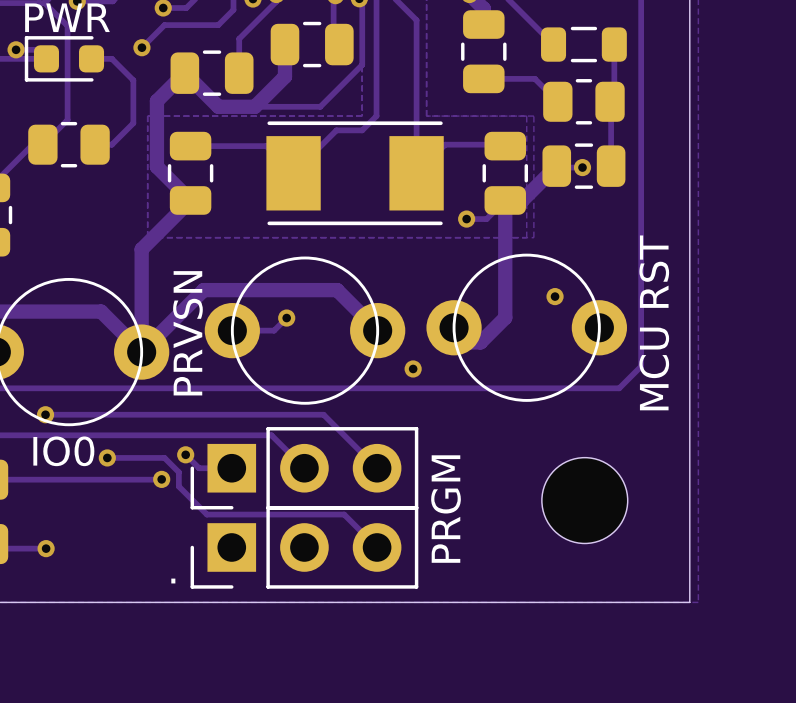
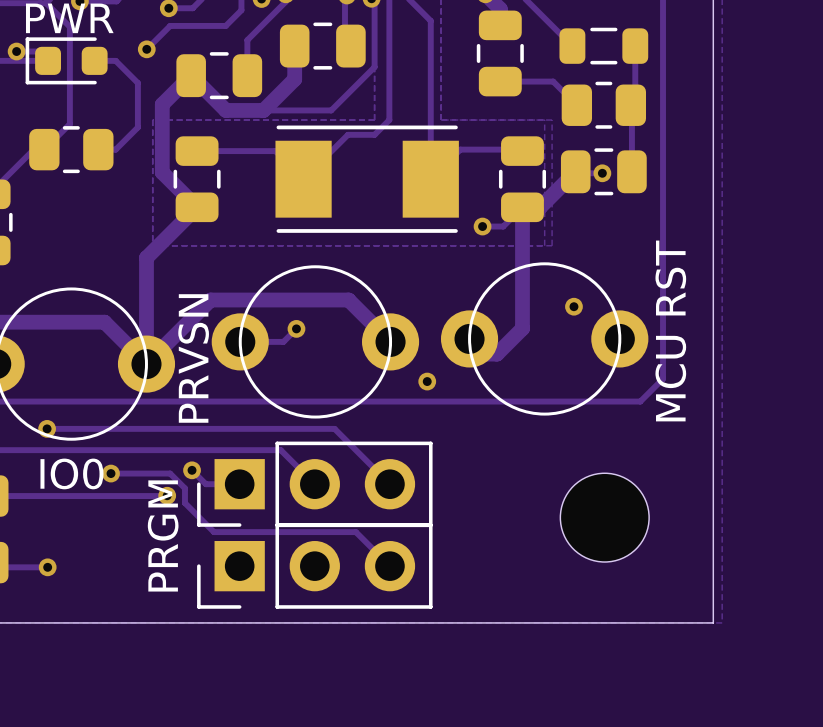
MCU RST name: none -> MCU RST (670, 330)
text: MCU RST (654, 322) -> none
text: PRVSN (187, 333) -> none
PRVSN name: none -> PRVSN (193, 358)
text: IO0 (63, 451) -> none
IO0 name: none -> IO0 (71, 473)
text: PRGM (446, 509) -> none
PRGM name: none -> PRGM (163, 535)
text: . (173, 581) -> none

